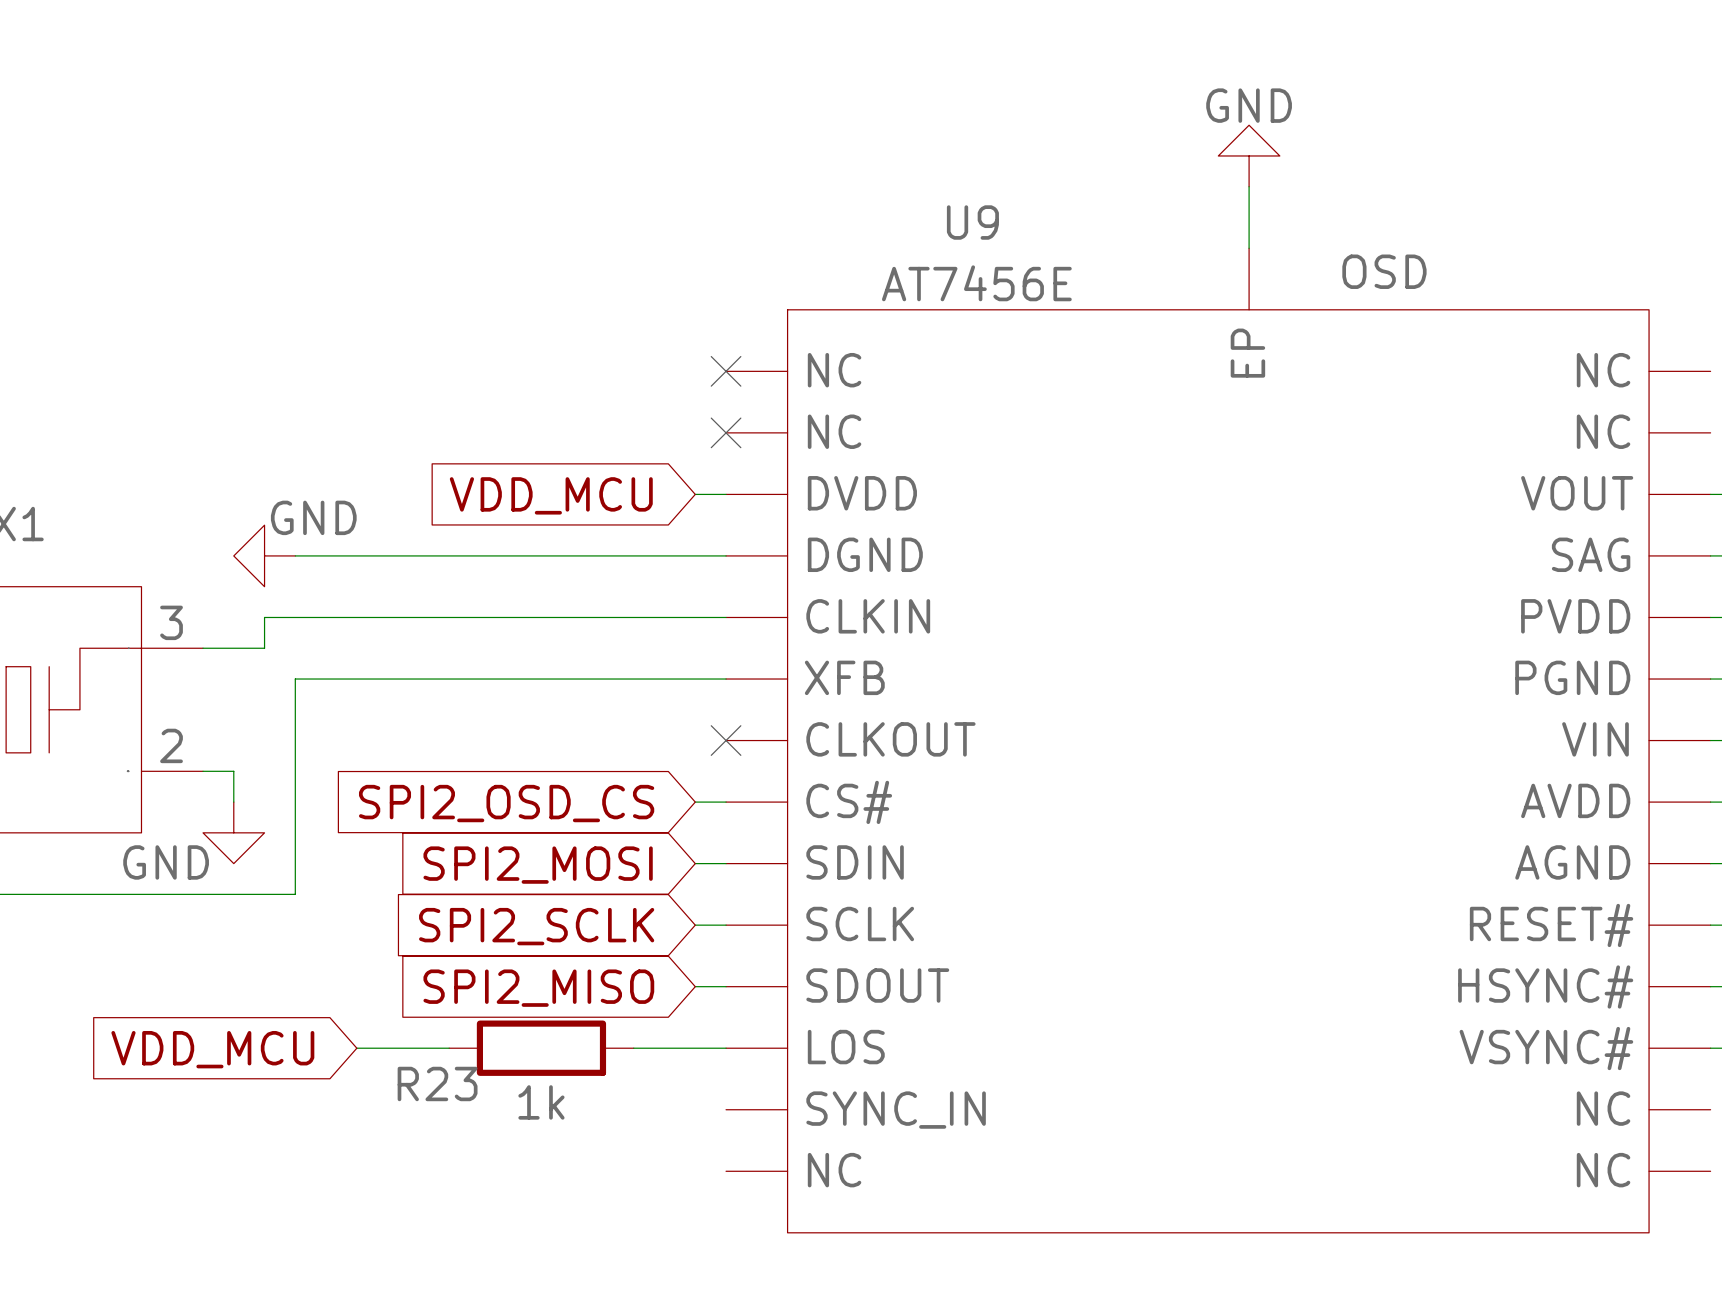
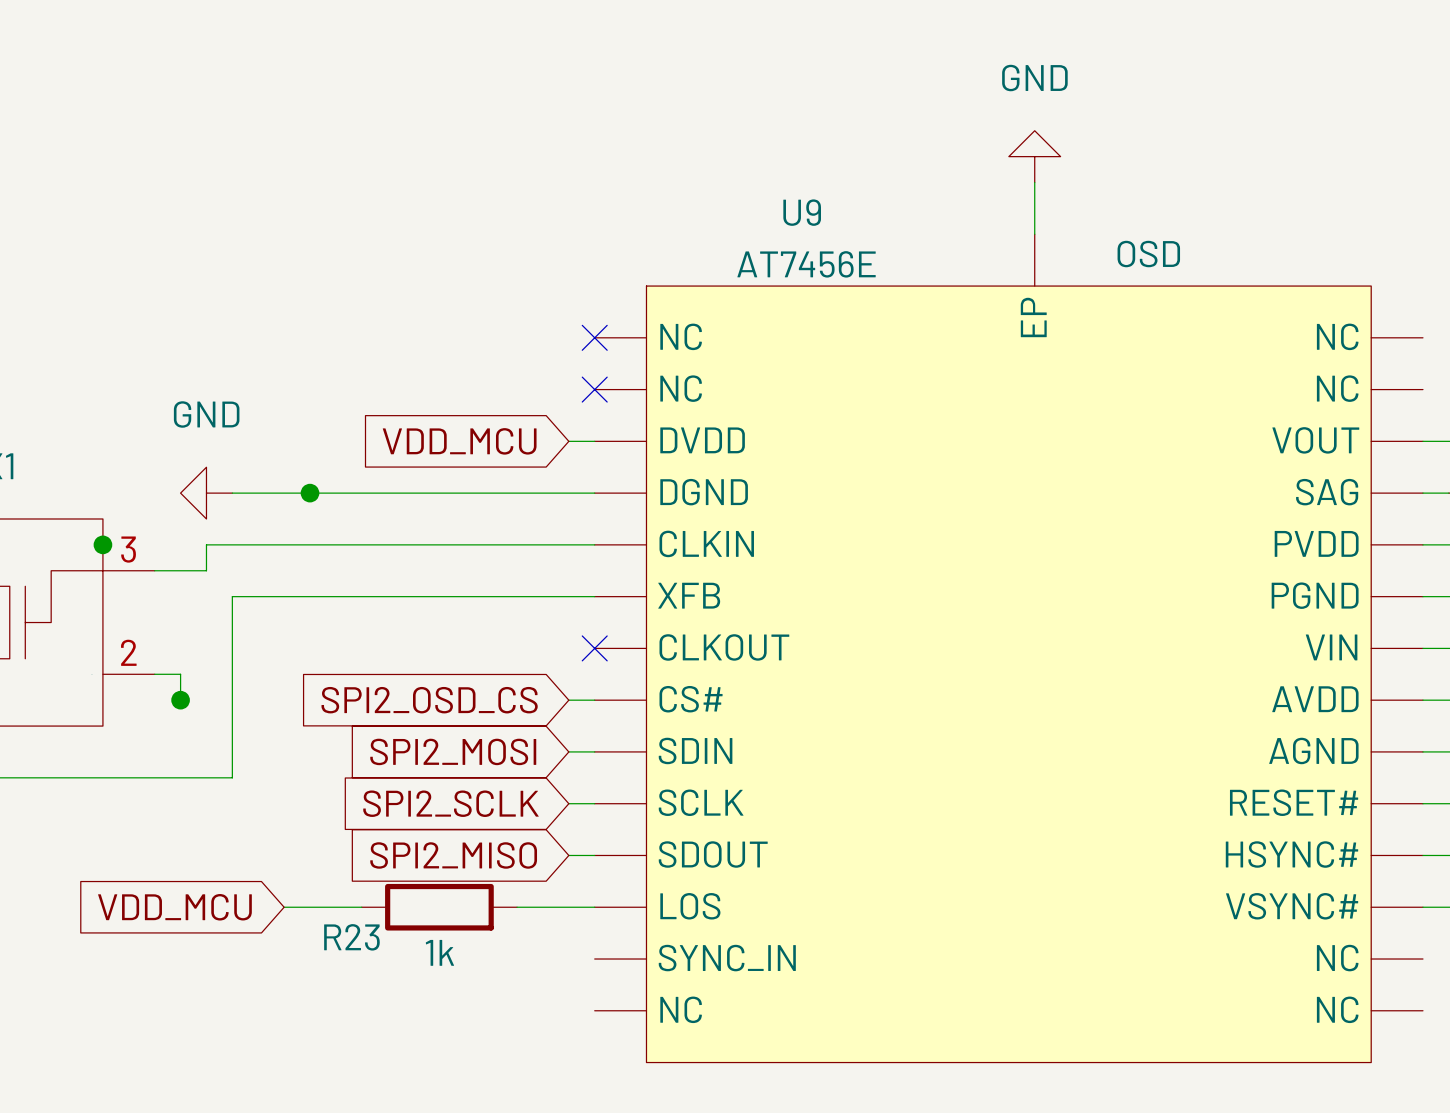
power symbol text position: GND (1249, 105) -> GND (1034, 78)
power symbol text position: GND (313, 517) -> GND (206, 414)
junction: none -> (310, 493)
junction: none -> (102, 544)
junction: none -> (180, 700)
power symbol: GND (233, 832) -> none

